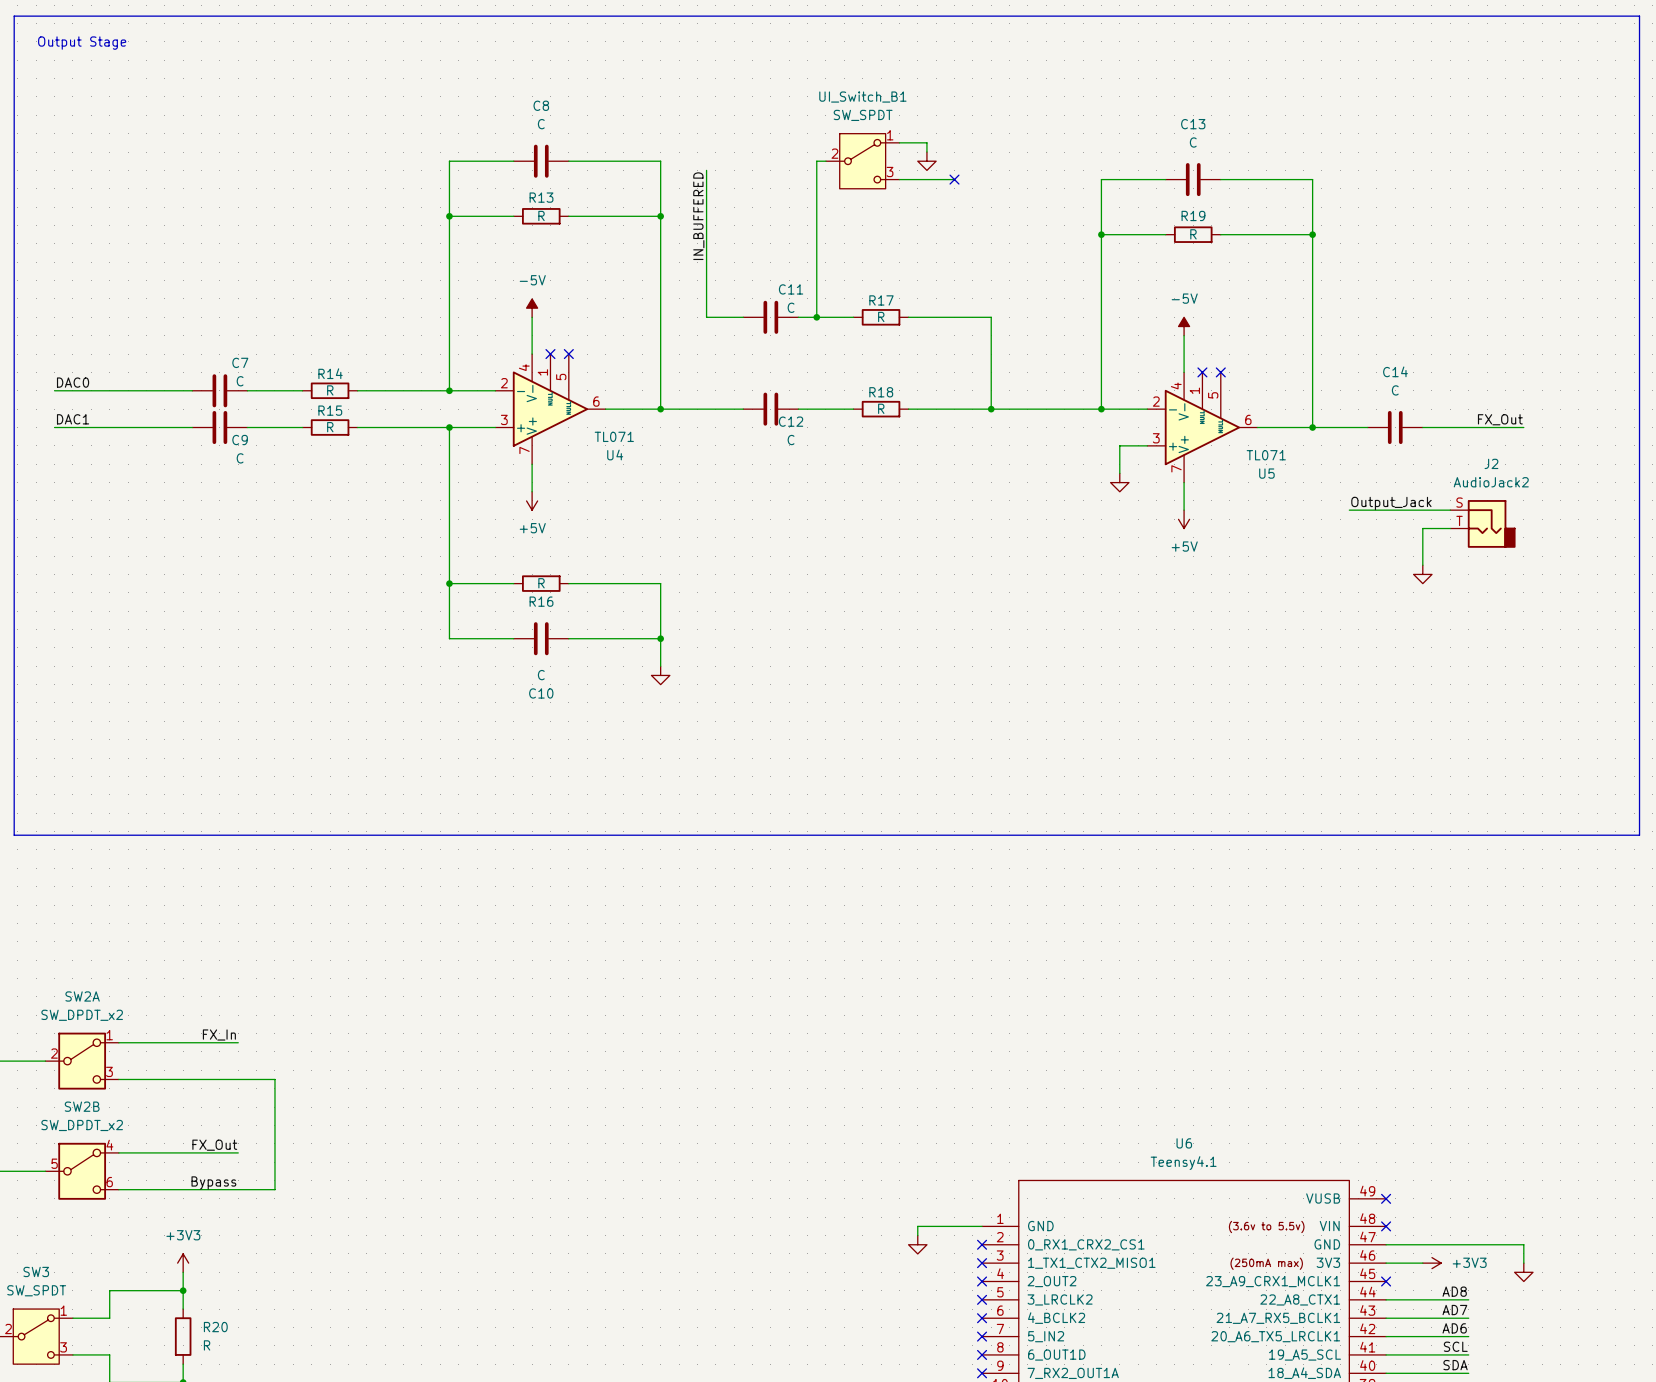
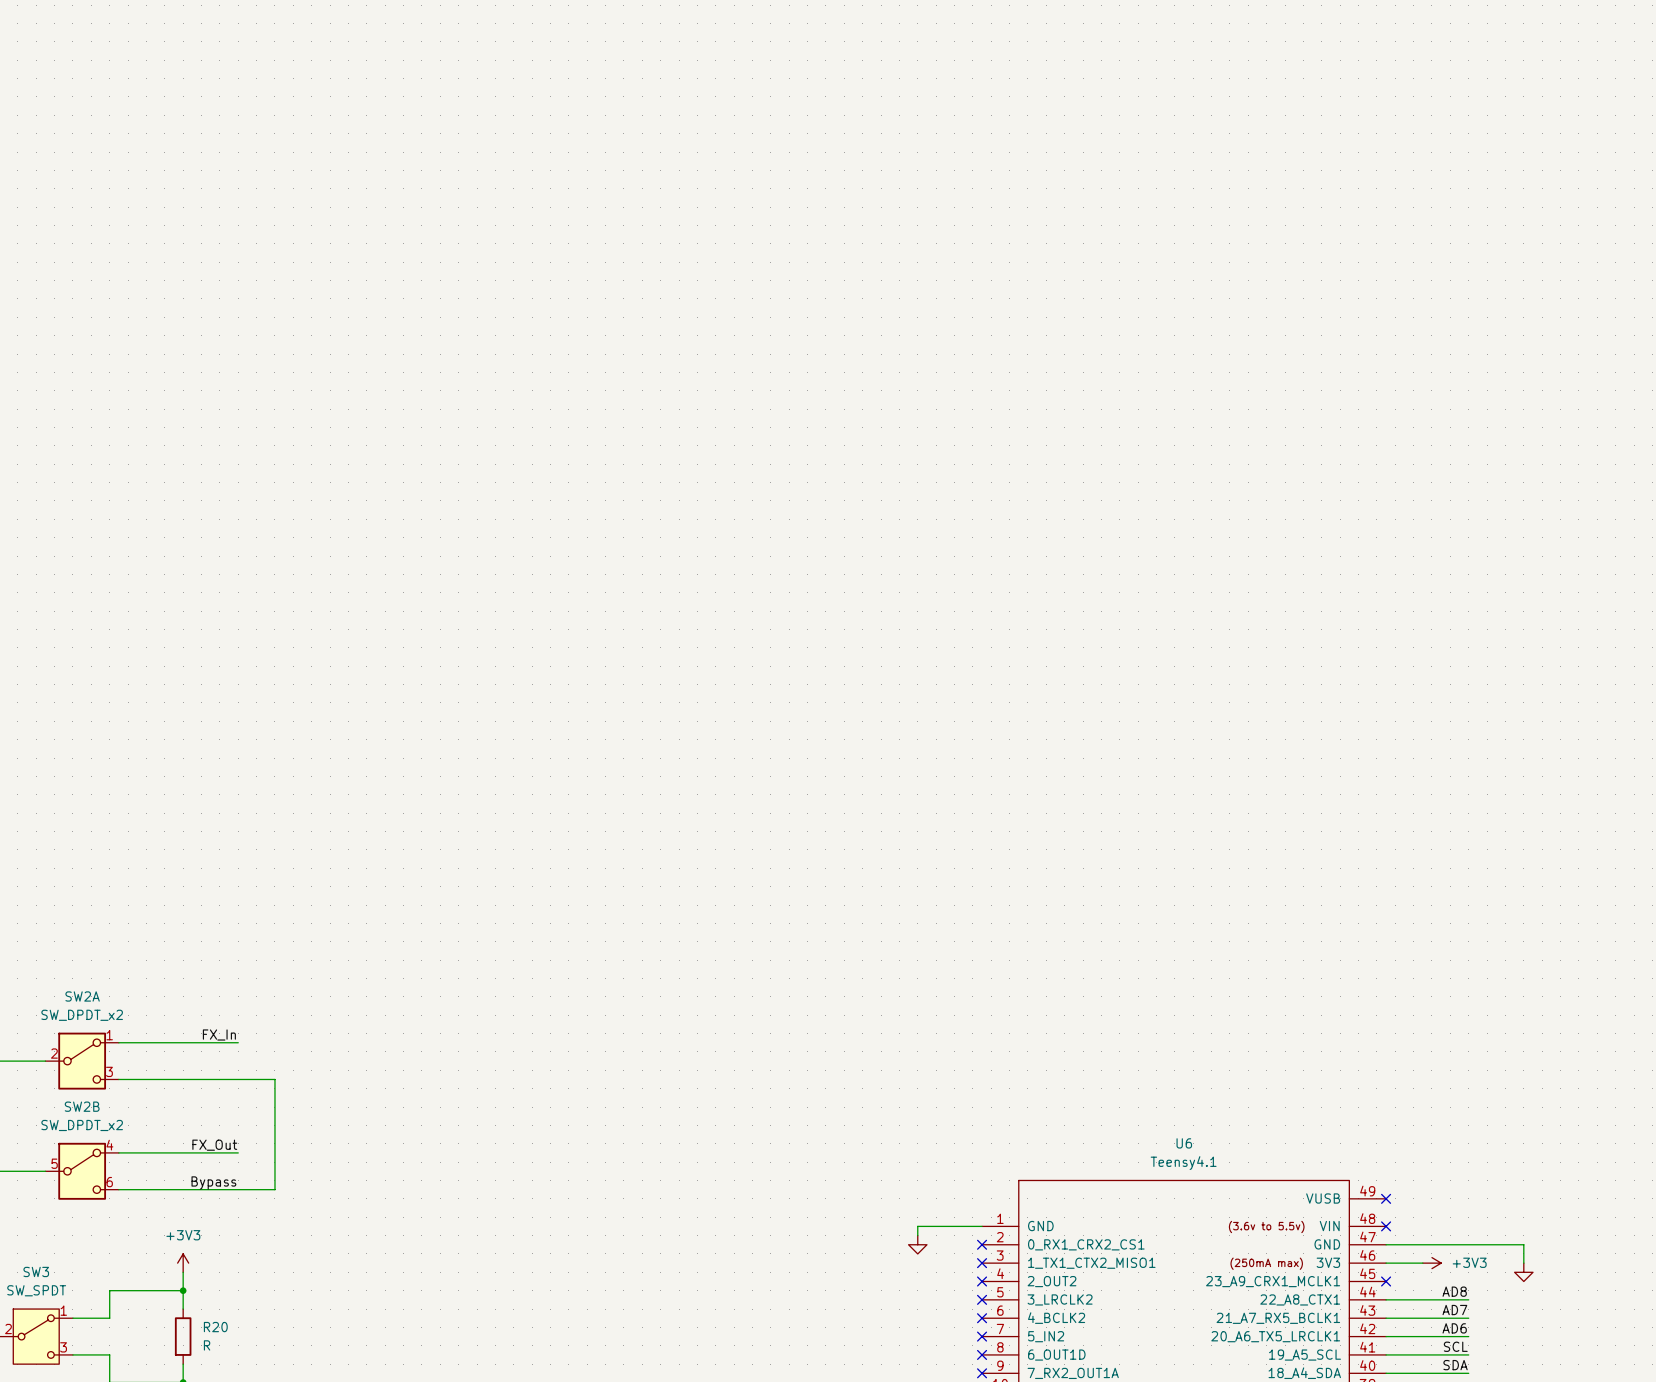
line: (14, 16) (1639, 16) (1639, 835) (14, 835) (14, 16) -> none
text: Output Stage (82, 43) -> none
wire: (899, 142) (926, 142) (926, 152) -> none
wire: (513, 161) (449, 161) (449, 390) -> none
C8: C (541, 161) -> none
wire: (568, 161) (660, 161) (660, 409) -> none
wire: (825, 161) (816, 161) (816, 317) -> none
UI_Switch_B1: SW_SPDT (862, 161) -> none
power symbol: (926, 161) -> none
wire: (706, 170) (706, 317) (743, 317) -> none
wire: (899, 179) (954, 179) -> none
no-connect mark: (954, 179) -> none
wire: (1165, 179) (1101, 179) (1101, 409) -> none
C13: C (1193, 179) -> none
wire: (1220, 179) (1312, 179) (1312, 427) -> none
wire: (449, 216) (513, 216) -> none
junction: (449, 216) -> none
R13: R (541, 216) -> none
wire: (568, 216) (660, 216) -> none
junction: (660, 216) -> none
label: IN_BUFFERED (698, 216) -> none
wire: (1101, 234) (1165, 234) -> none
junction: (1101, 234) -> none
R19: R (1193, 234) -> none
wire: (1220, 234) (1312, 234) -> none
junction: (1312, 234) -> none
power symbol: -5V (532, 308) -> none
wire: (532, 317) (532, 354) -> none
C11: C (770, 317) -> none
wire: (798, 317) (853, 317) -> none
junction: (816, 317) -> none
R17: R (881, 317) -> none
wire: (908, 317) (991, 317) (991, 409) -> none
power symbol: -5V (1184, 326) -> none
wire: (1184, 335) (1184, 372) -> none
no-connect mark: (550, 354) -> none
no-connect mark: (568, 354) -> none
no-connect mark: (1202, 372) -> none
no-connect mark: (1220, 372) -> none
label: DAC0 (73, 382) -> none
wire: (54, 390) (192, 390) -> none
C7: C (219, 390) -> none
wire: (247, 390) (302, 390) -> none
R14: R (330, 390) -> none
wire: (357, 390) (495, 390) -> none
junction: (449, 390) -> none
U4: TL071 (550, 409) -> none
wire: (605, 409) (743, 409) -> none
junction: (660, 409) -> none
C12: C (770, 409) -> none
wire: (798, 409) (853, 409) -> none
R18: R (881, 409) -> none
wire: (908, 409) (1147, 409) -> none
junction: (991, 409) -> none
junction: (1101, 409) -> none
label: DAC1 (73, 419) -> none
label: FX_Out (1500, 419) -> none
wire: (54, 427) (192, 427) -> none
C9: C (219, 427) -> none
wire: (247, 427) (302, 427) -> none
R15: R (330, 427) -> none
wire: (357, 427) (495, 427) -> none
wire: (449, 427) (449, 638) (513, 638) -> none
junction: (449, 427) -> none
U5: TL071 (1202, 427) -> none
wire: (1257, 427) (1367, 427) -> none
junction: (1312, 427) -> none
C14: C (1395, 427) -> none
wire: (1422, 427) (1523, 427) -> none
wire: (1147, 445) (1119, 445) (1119, 473) -> none
wire: (532, 464) (532, 491) -> none
power symbol: (1119, 482) -> none
wire: (1184, 482) (1184, 510) -> none
power symbol: +5V (532, 500) -> none
label: Output_Jack (1391, 503) -> none
wire: (1349, 510) (1450, 510) -> none
power symbol: +5V (1184, 519) -> none
J2: AudioJack2 (1482, 523) -> none
wire: (1450, 528) (1422, 528) (1422, 565) -> none
power symbol: (1422, 574) -> none
wire: (449, 583) (513, 583) -> none
junction: (449, 583) -> none
R16: R (541, 583) -> none
wire: (568, 583) (660, 583) (660, 666) -> none
C10: C (541, 638) -> none
wire: (568, 638) (660, 638) -> none
junction: (660, 638) -> none
power symbol: (660, 675) -> none

